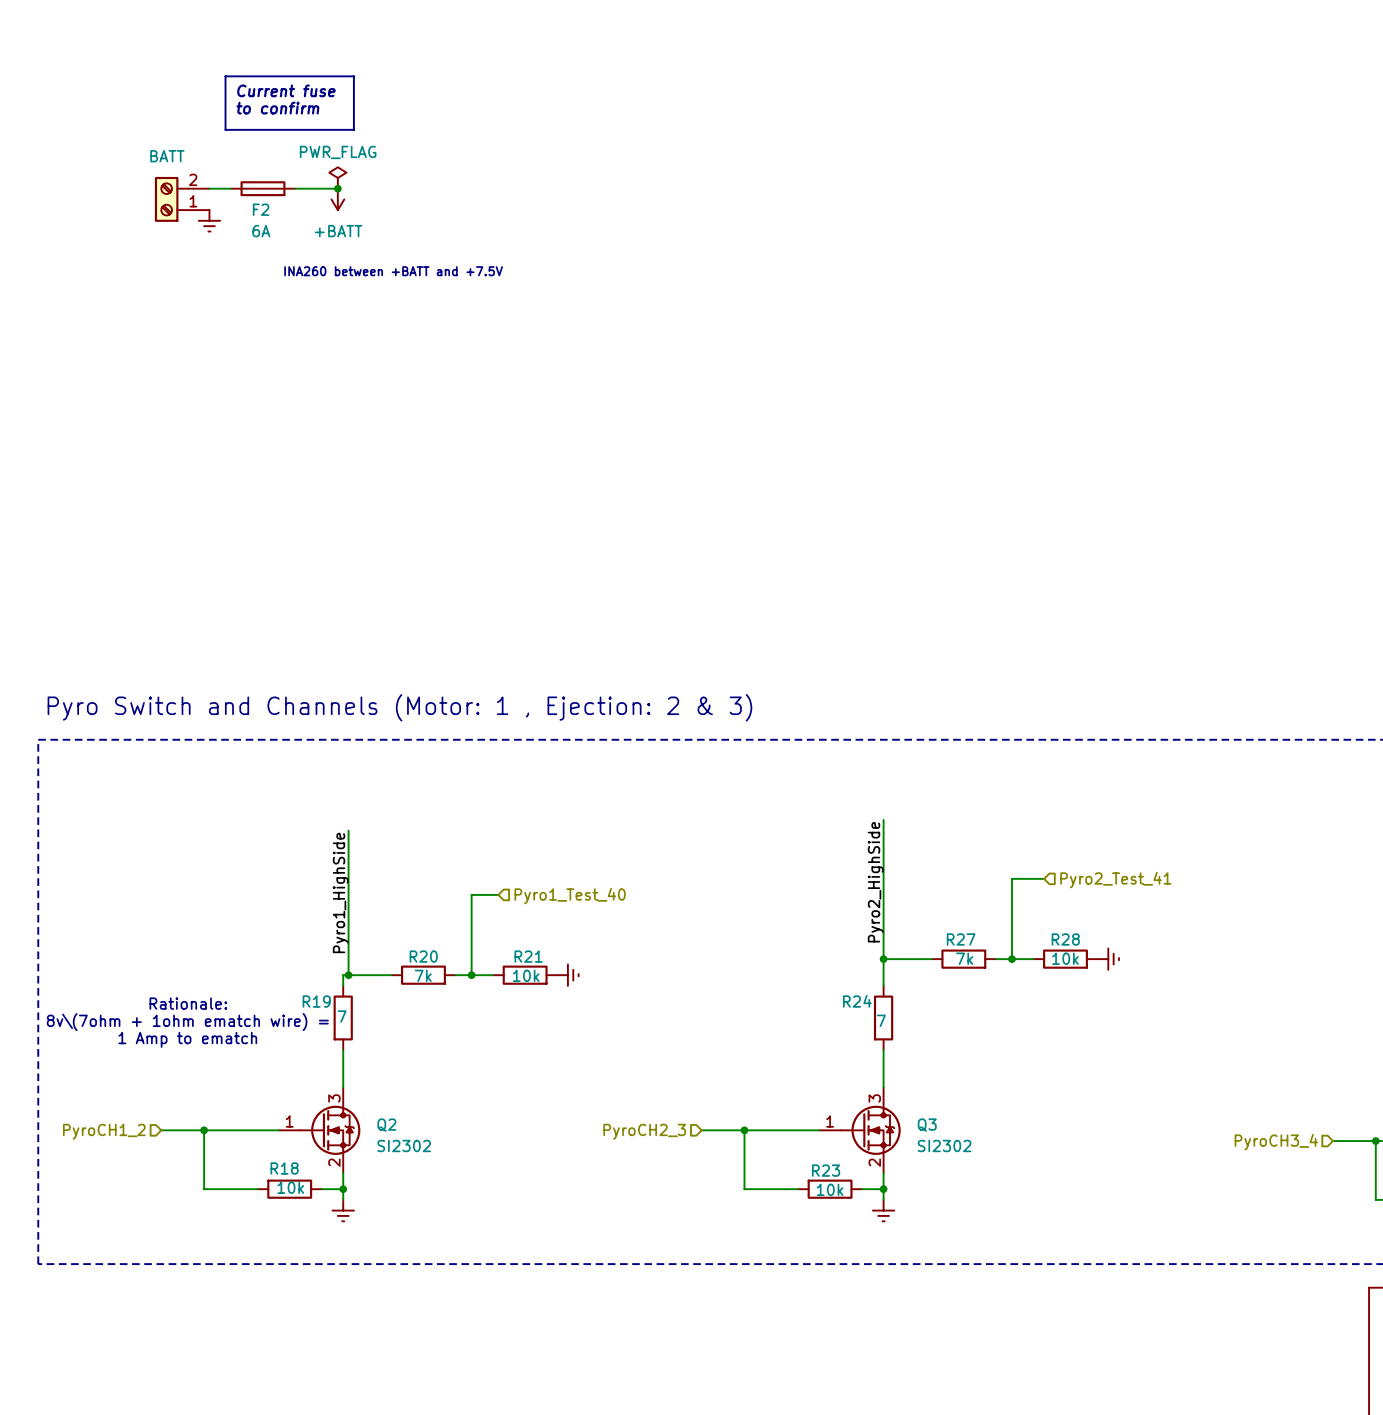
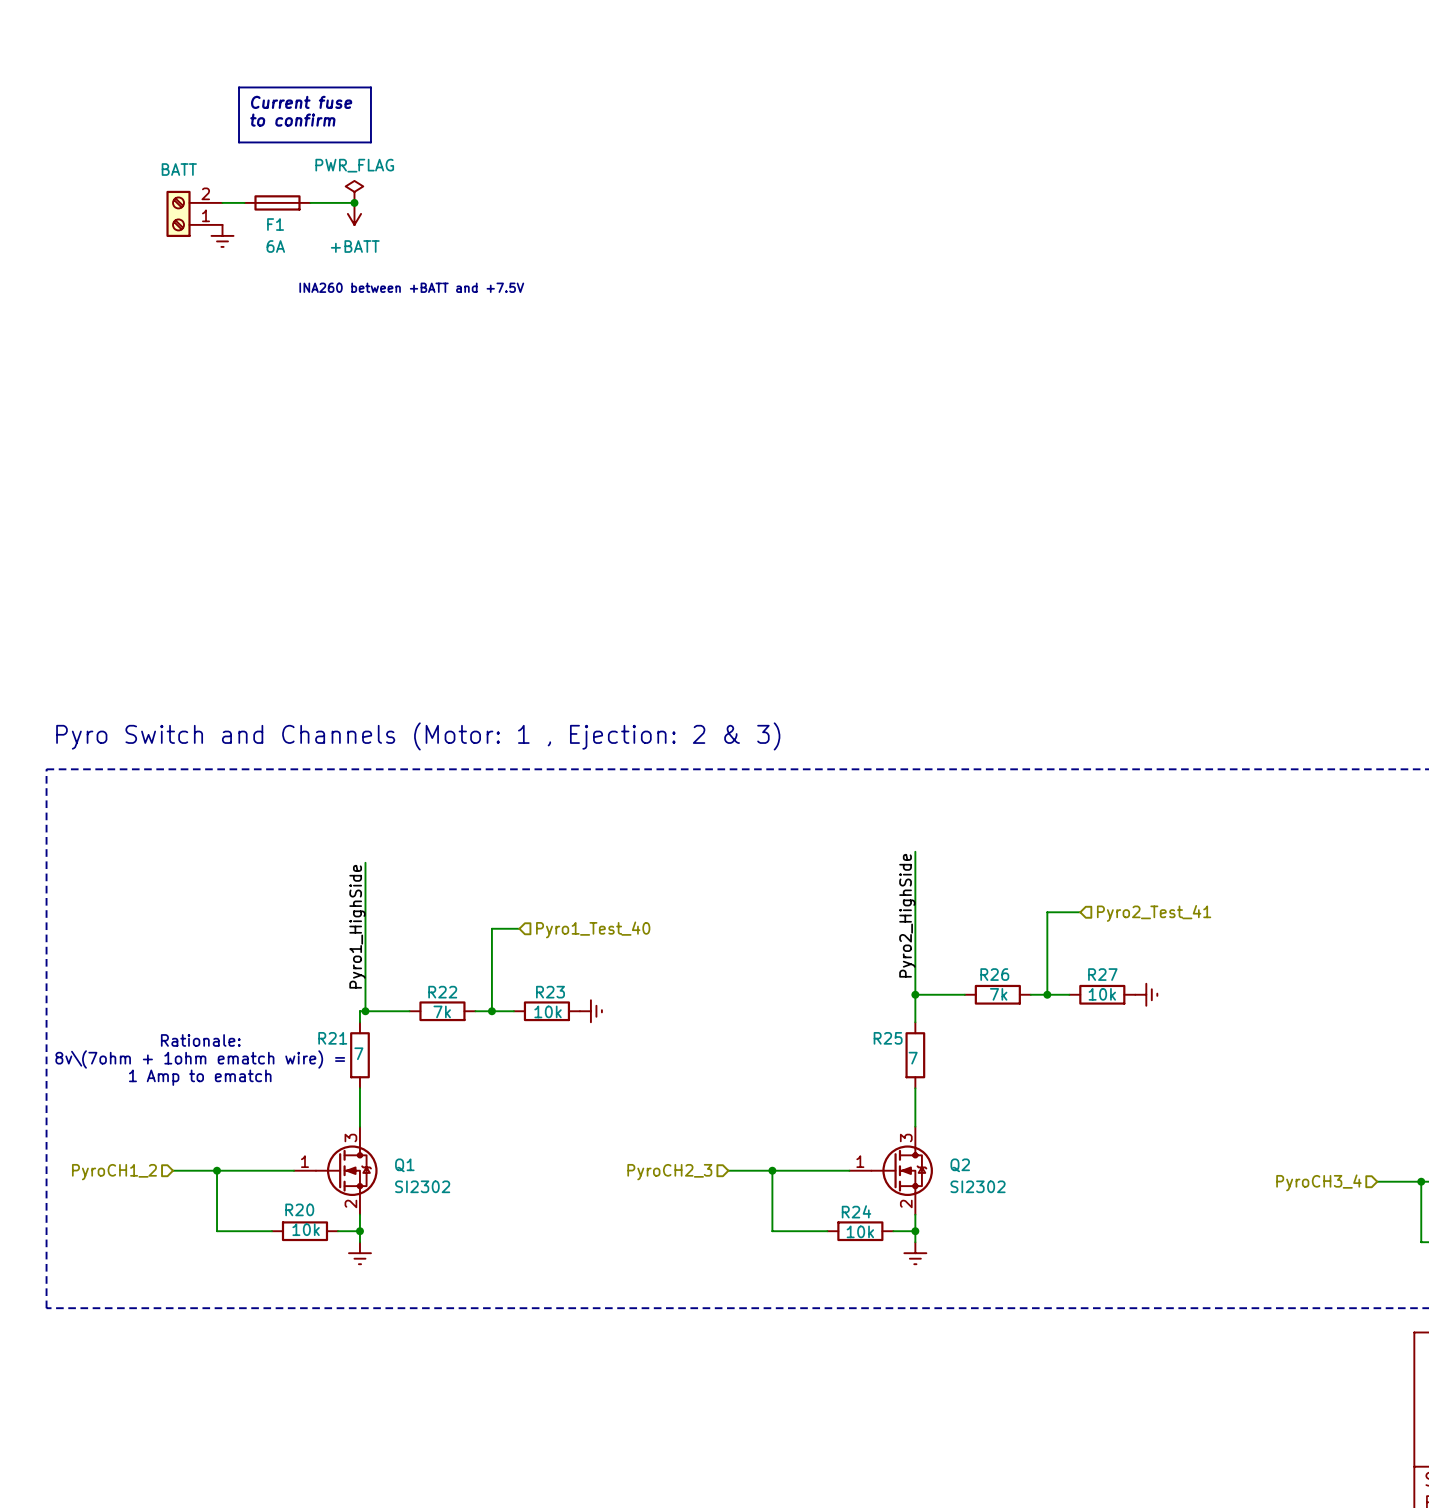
F2 name: F2 (261, 209) -> F1 (275, 224)
R27 name: R27 (961, 939) -> R26 (994, 974)
R28 name: R28 (1065, 939) -> R27 (1102, 974)
R20 name: R20 (423, 956) -> R22 (442, 992)
R21 name: R21 (528, 956) -> R23 (550, 992)
R19 name: R19 (316, 1001) -> R21 (332, 1038)
R24 name: R24 (857, 1001) -> R25 (888, 1038)
Q2 name: Q2 (386, 1125) -> Q1 (404, 1165)
Q3 name: Q3 (927, 1125) -> Q2 (960, 1165)
R18 name: R18 (284, 1168) -> R20 (299, 1209)
R23 name: R23 (826, 1170) -> R24 (856, 1211)

